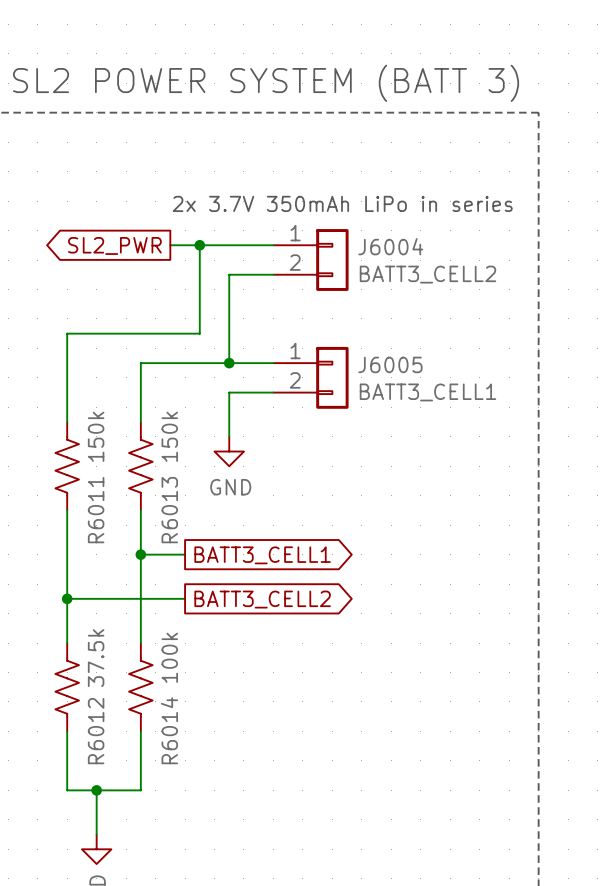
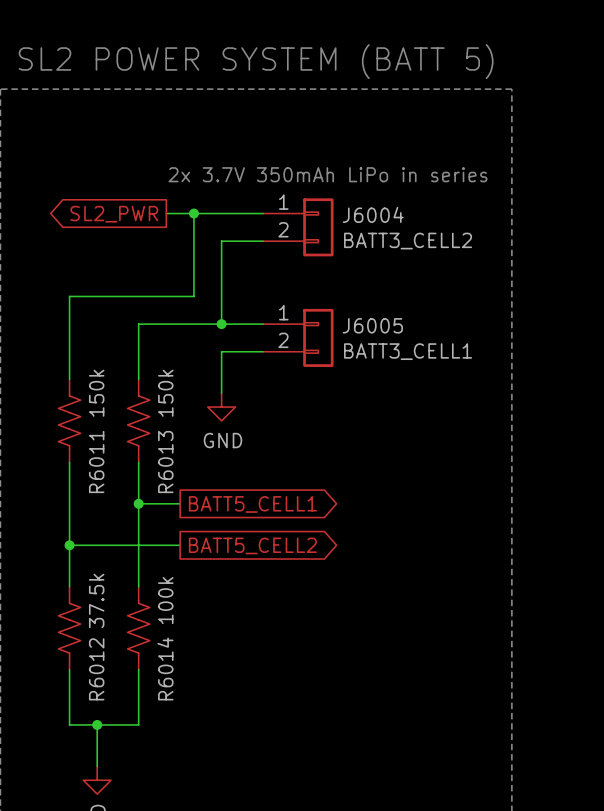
text: SL2 POWER SYSTEM (BATT 3) (266, 83) -> SL2 POWER SYSTEM (BATT 5) (256, 61)
global label: BATT3_CELL1 (262, 555) -> BATT5_CELL1 (252, 504)
global label: BATT3_CELL2 (262, 599) -> BATT5_CELL2 (252, 545)

